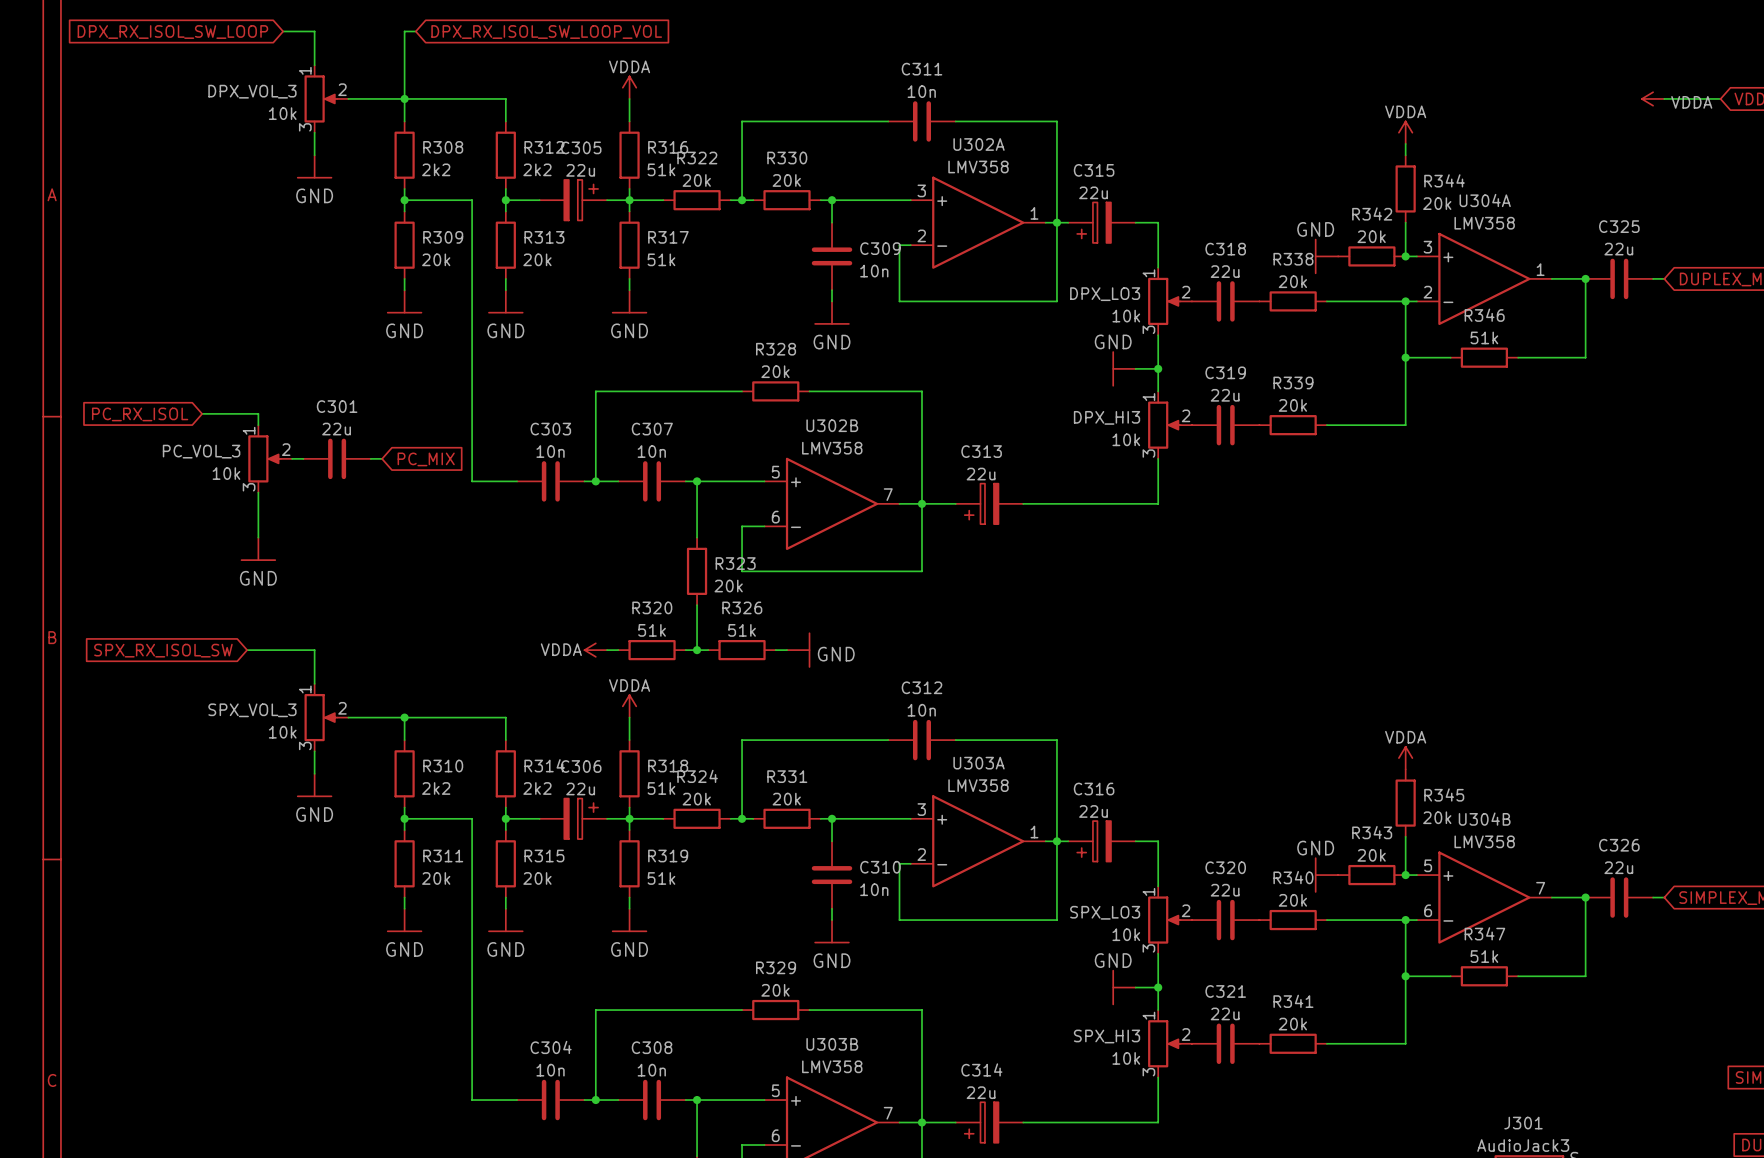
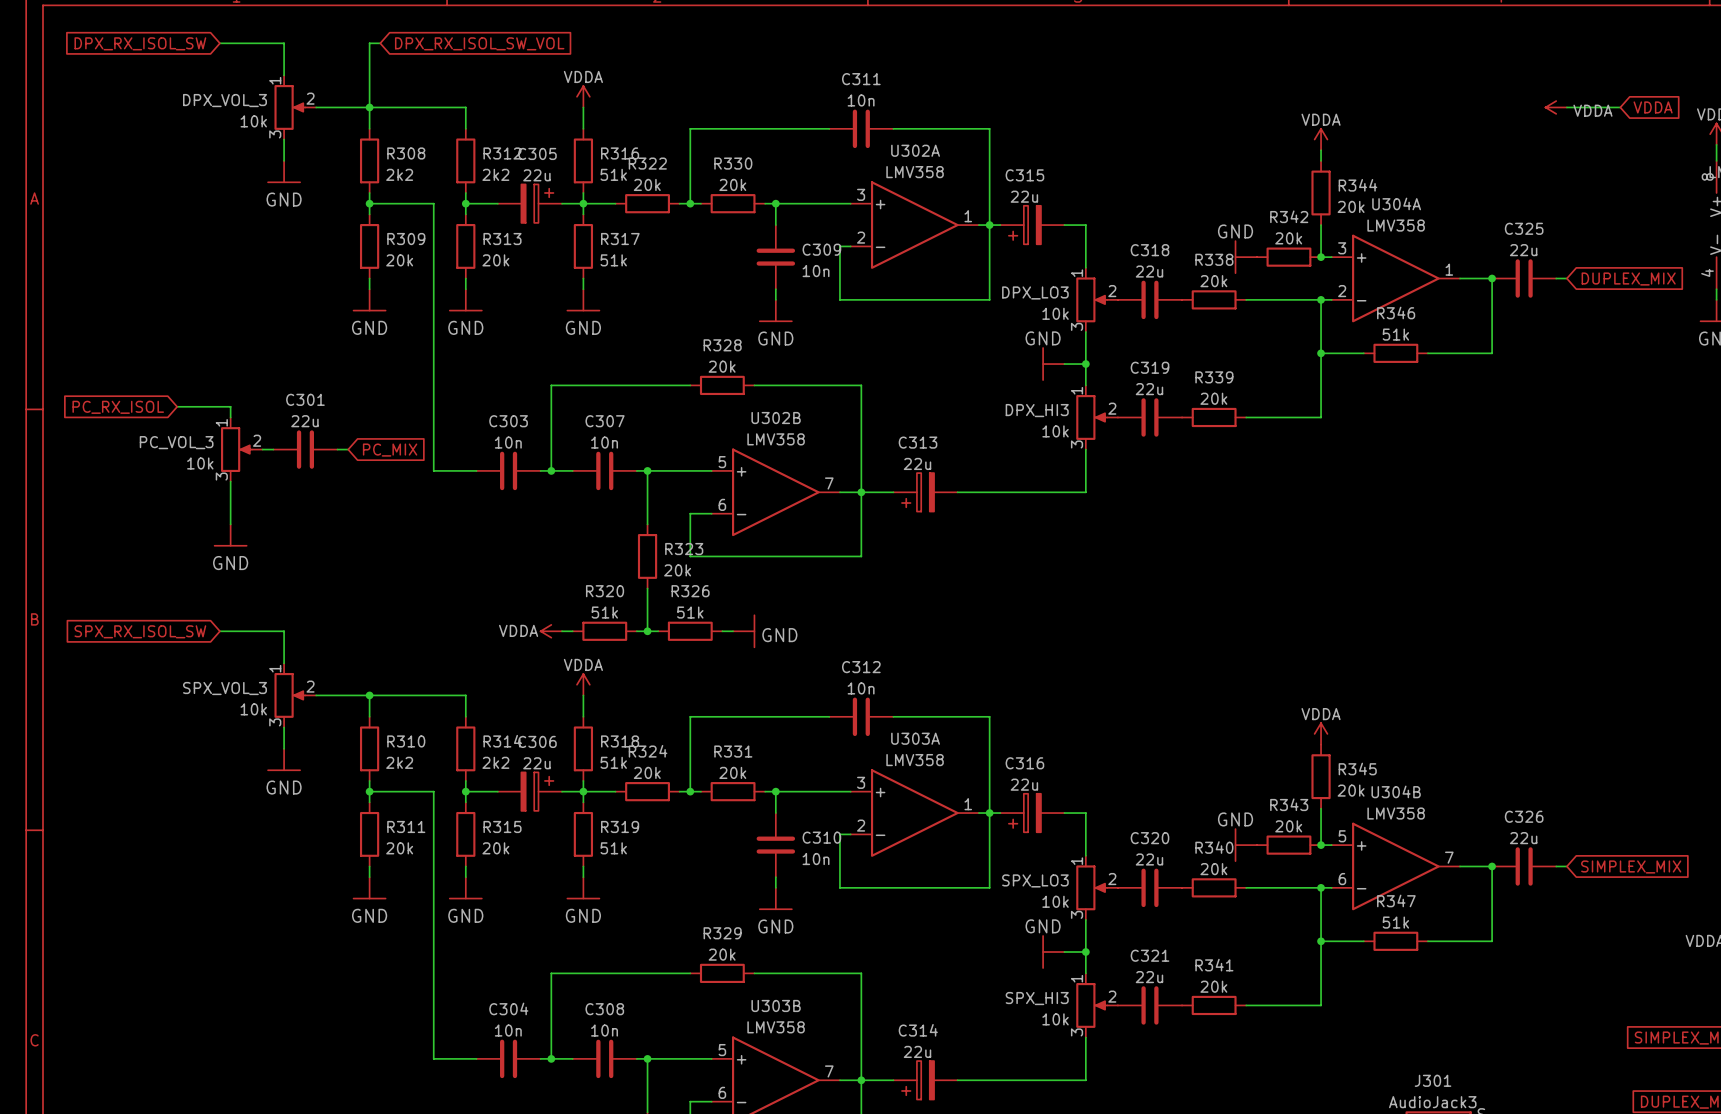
wire: none -> (219, 43) (254, 43)
global label: DPX_RX_ISOL_SW_LOOP (172, 32) -> DPX_RX_ISOL_SW (140, 43)
global label: DPX_RX_ISOL_SW_LOOP_VOL (546, 32) -> DPX_RX_ISOL_SW_VOL (479, 43)

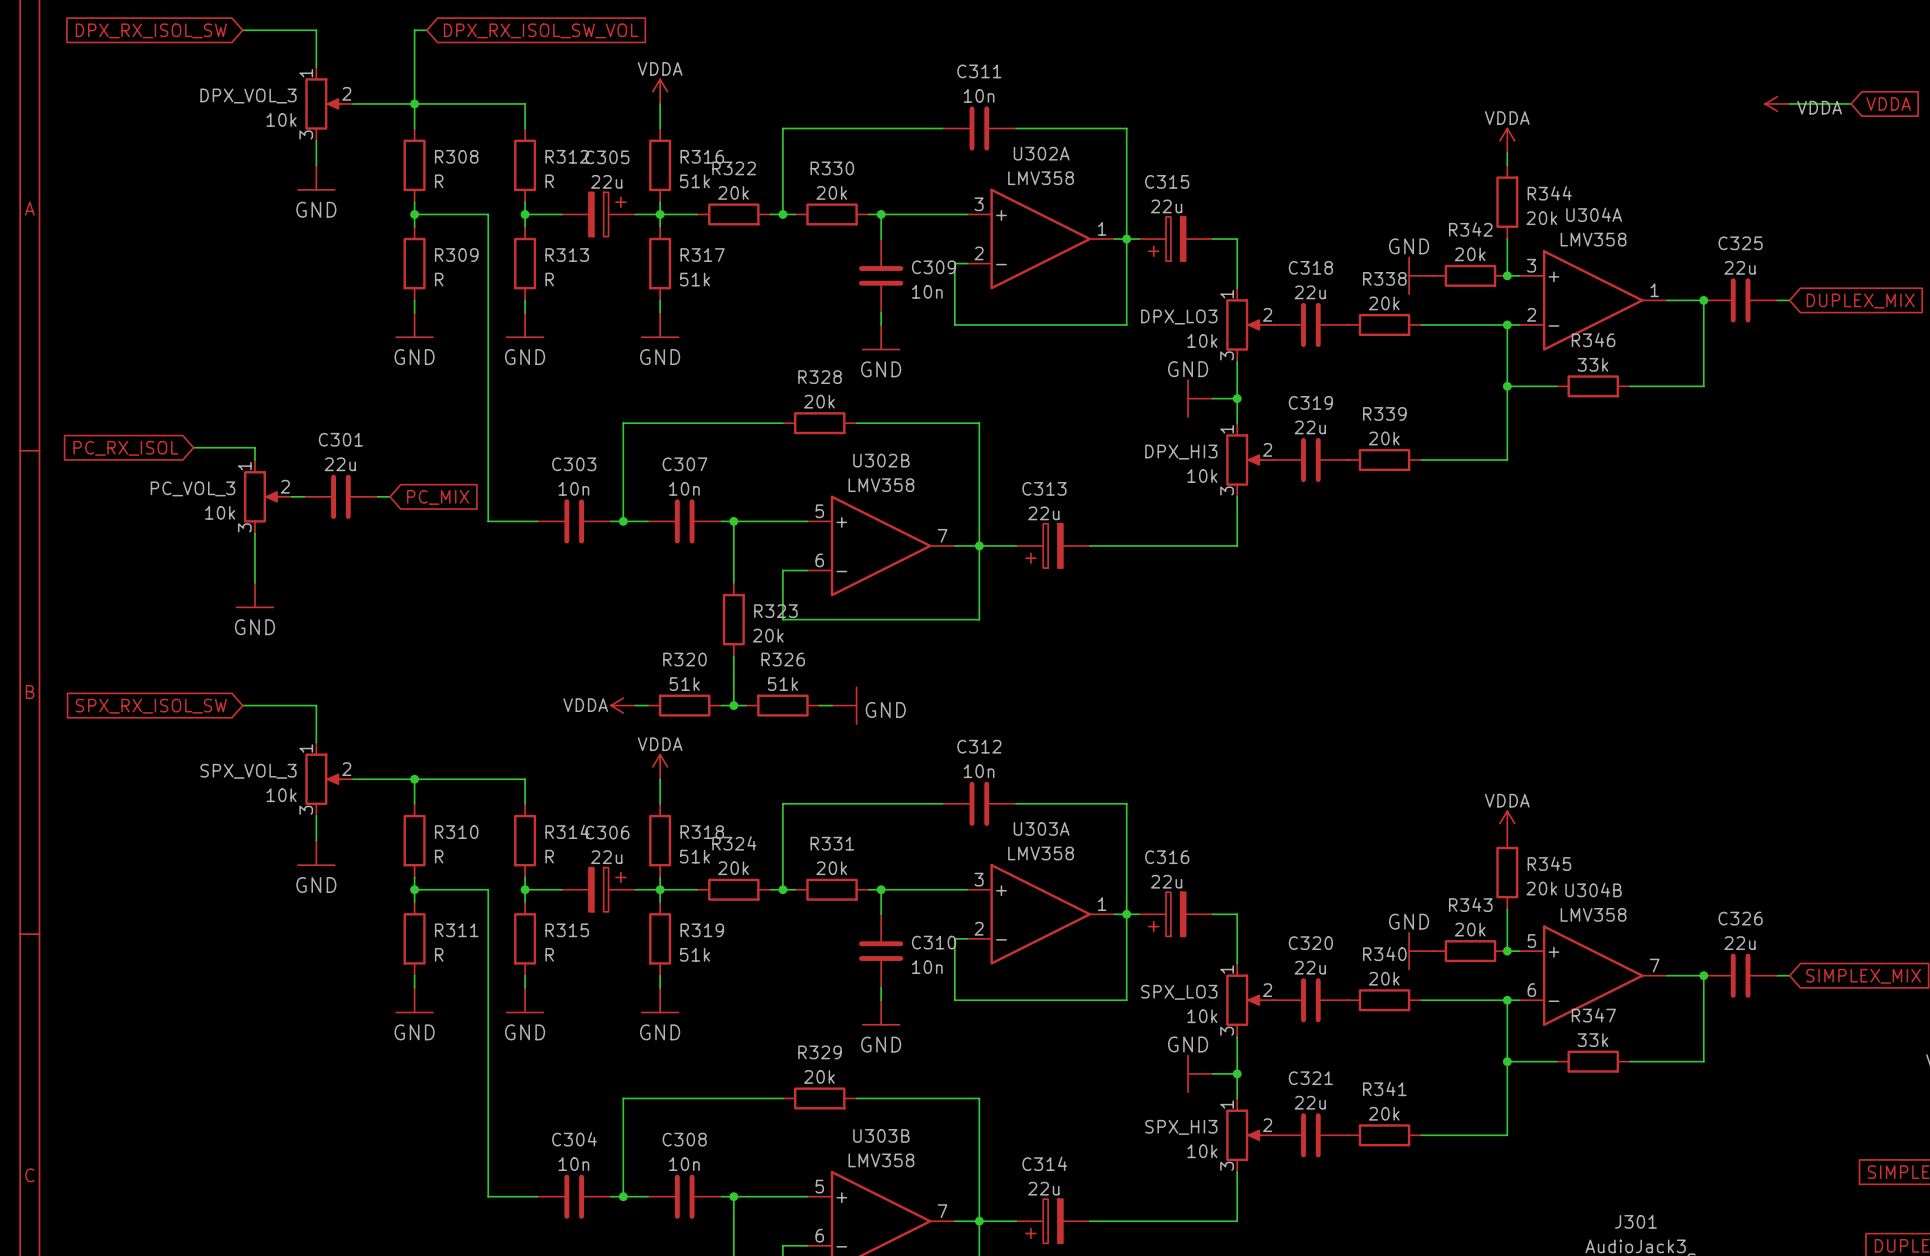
R308 value: 2k2 (399, 174) -> R (439, 181)
R312 value: 2k2 (495, 174) -> R (549, 181)
R309 value: 20k (399, 260) -> R (439, 279)
R313 value: 20k (495, 260) -> R (549, 279)
R346 value: 51k (1395, 334) -> 33k (1592, 364)
R310 value: 2k2 (399, 762) -> R (439, 856)
R314 value: 2k2 (495, 762) -> R (549, 856)
R311 value: 20k (399, 848) -> R (439, 954)
R315 value: 20k (495, 848) -> R (549, 954)
R347 value: 51k (1395, 922) -> 33k (1592, 1040)

